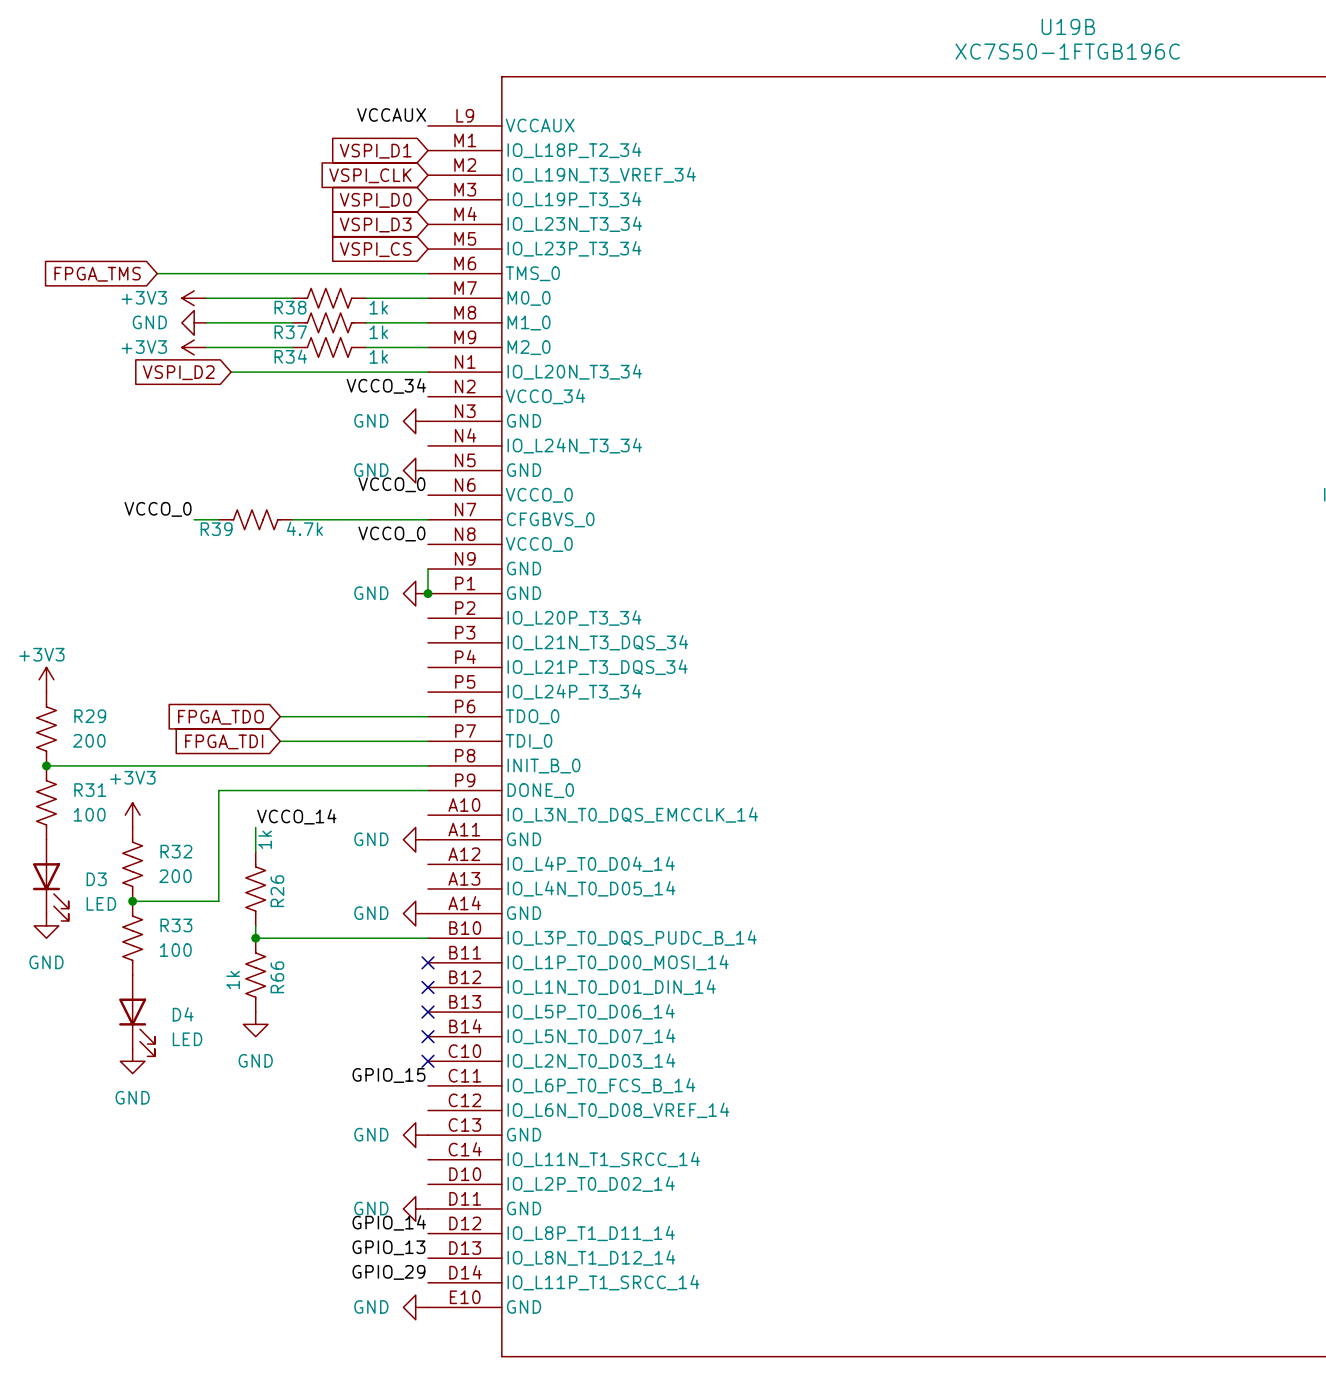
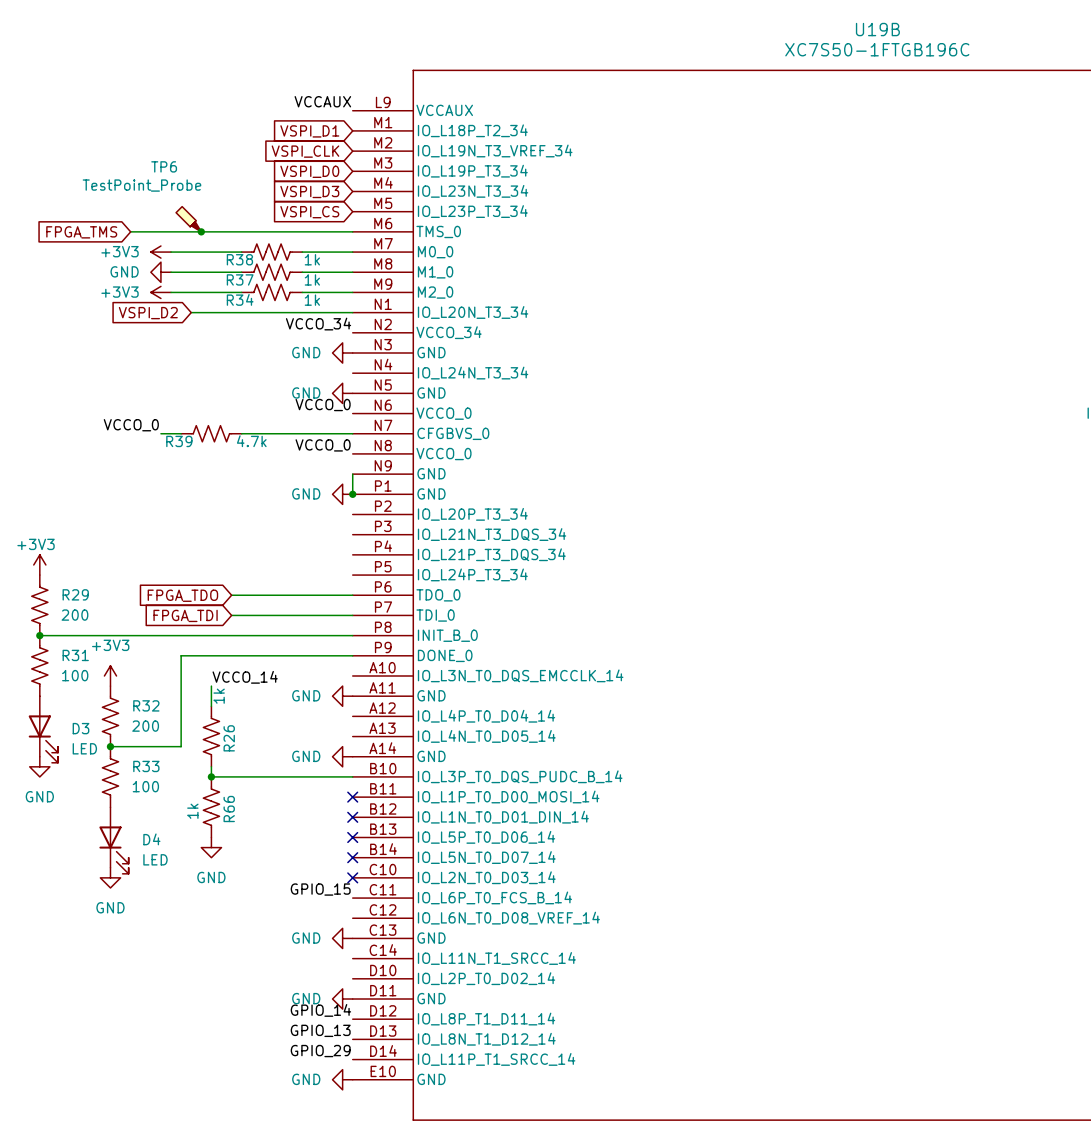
TP6: none -> TestPoint_Probe (188, 219)
junction: none -> (201, 231)

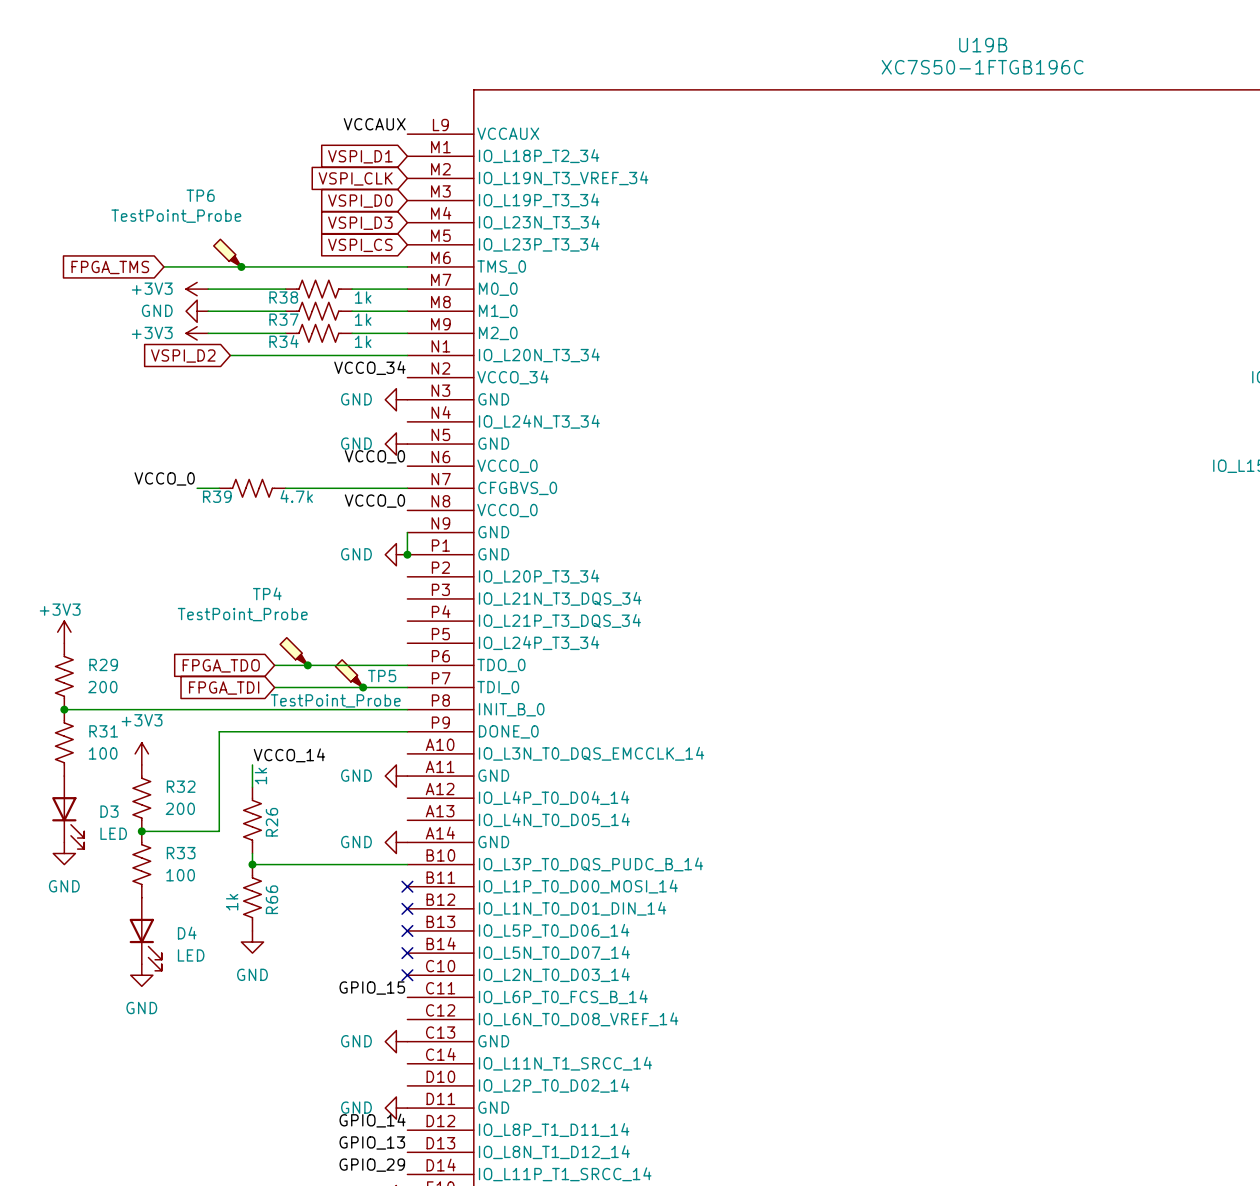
TP4: none -> TestPoint_Probe (293, 651)
junction: none -> (307, 665)
TP5: none -> TestPoint_Probe (349, 673)
junction: none -> (363, 687)

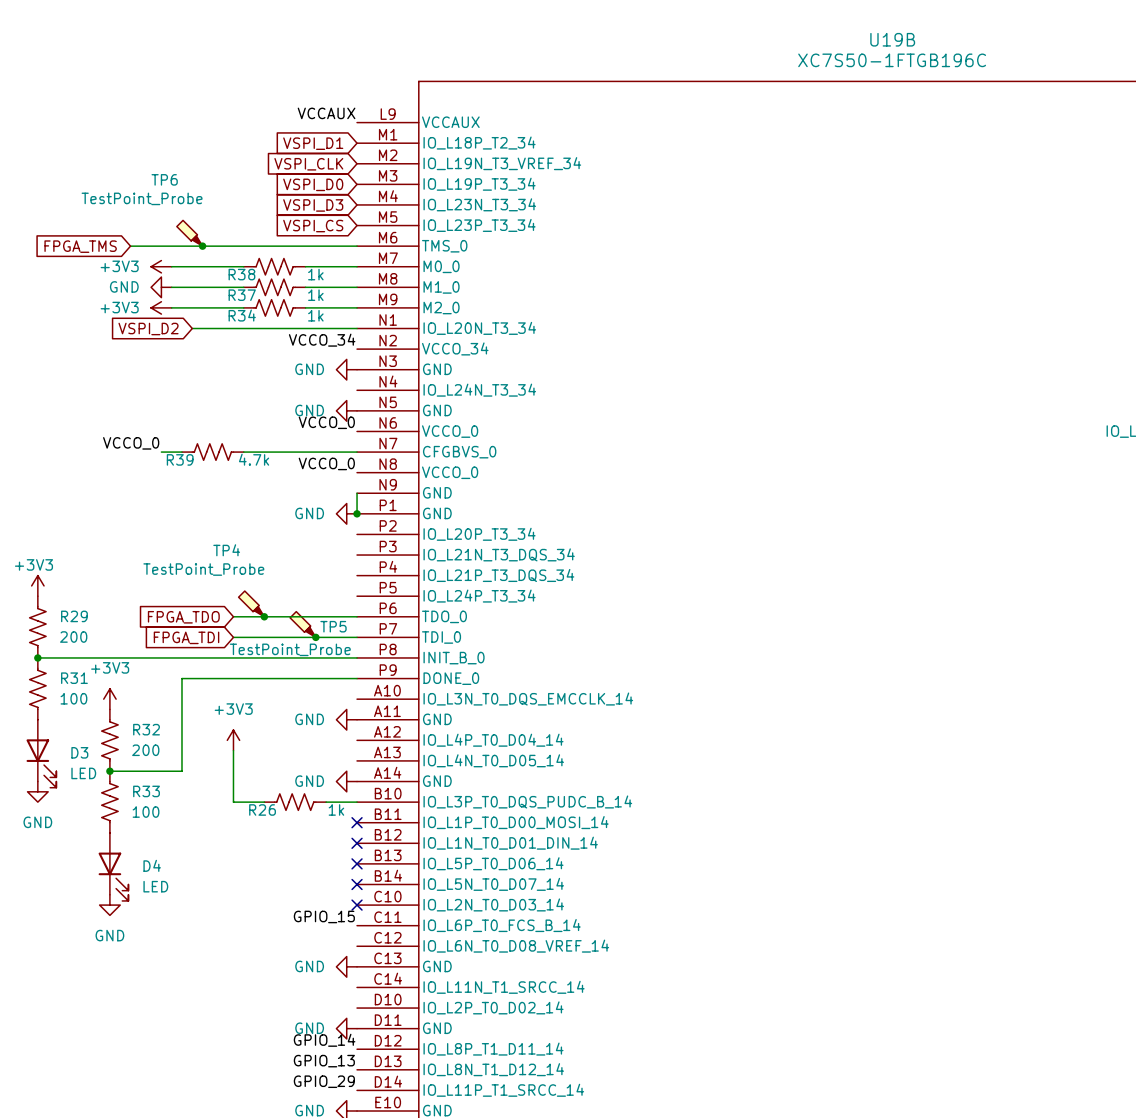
label: VCCO_14 (289, 755) -> none
wire: (252, 764) (252, 787) -> none
power symbol: none -> +3V3 (233, 740)
R26 rotation: 0° (252, 820) -> 90° clockwise (295, 802)
R26 position: (252, 820) -> (295, 802)
R26 name position: R26 (271, 822) -> R26 (262, 809)
wire: (252, 853) (252, 864) (274, 864) -> (233, 750) (233, 802)
junction: (252, 864) -> none
R66: 1k (252, 897) -> none
power symbol: GND (252, 942) -> none

